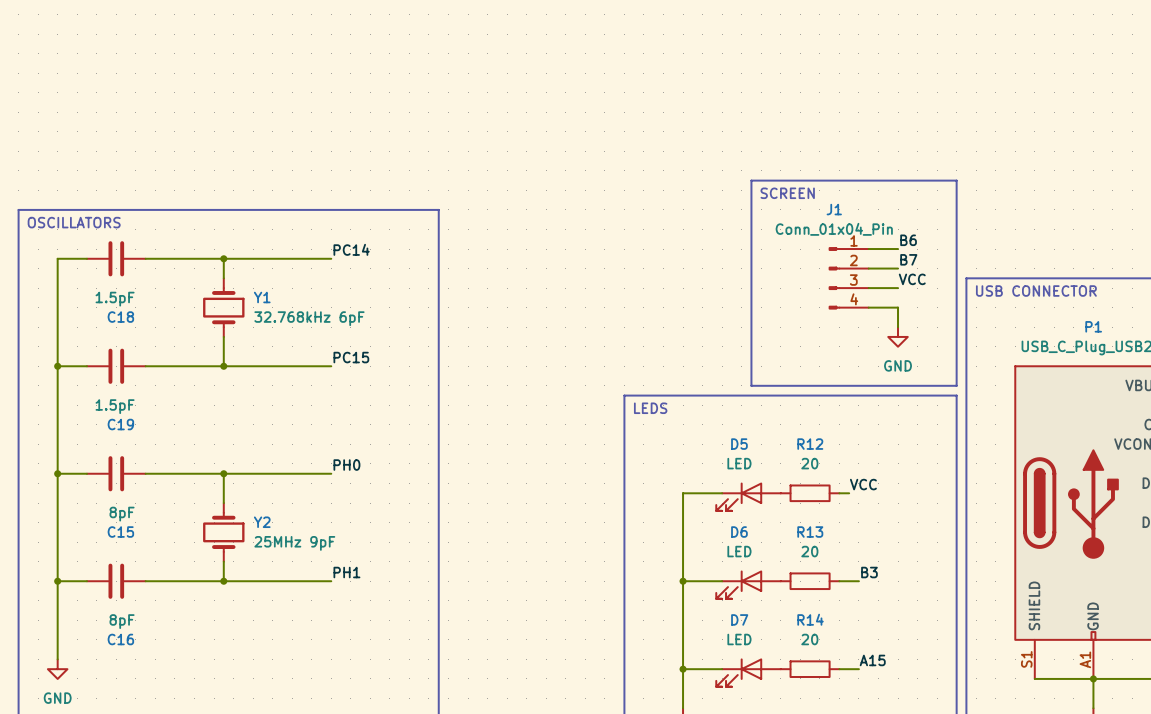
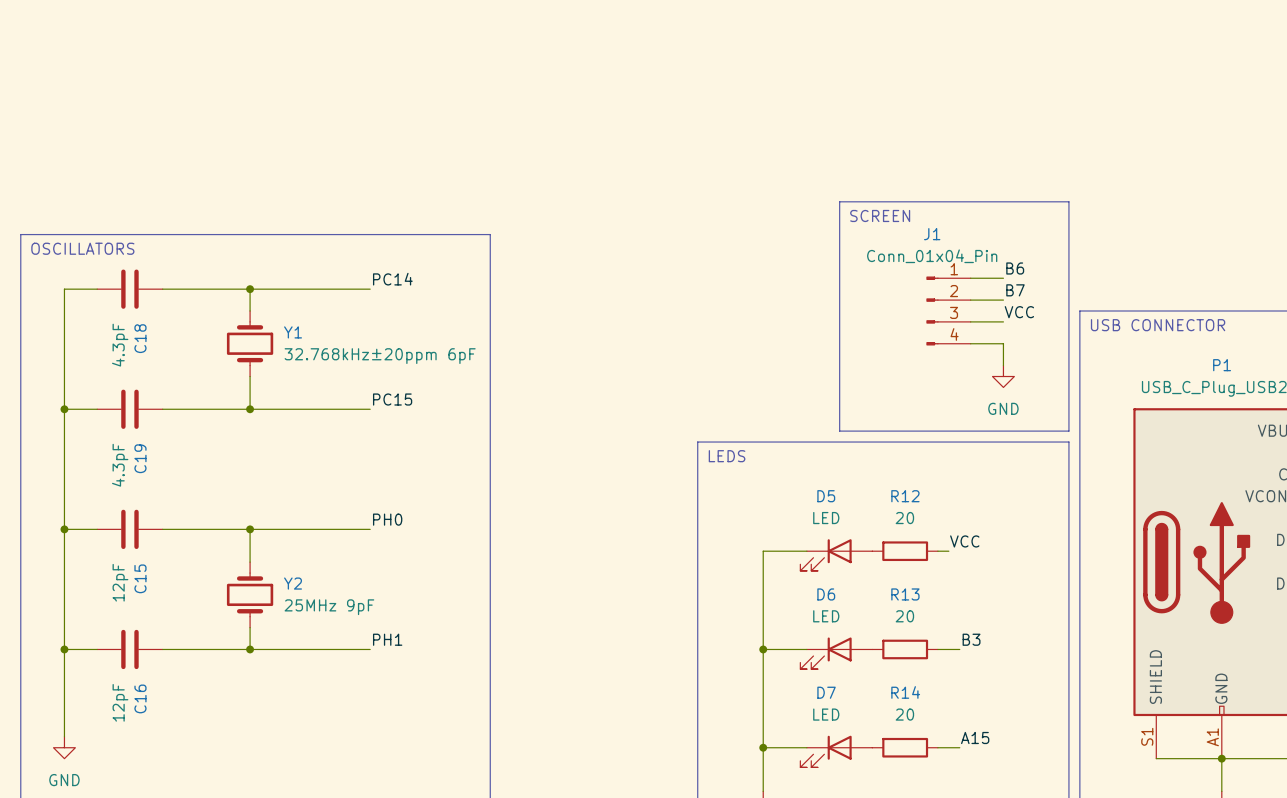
C18 value: 1.5pF (115, 299) -> 4.3pF (120, 345)
C18 name rotation: 0° (120, 317) -> 90° counterclockwise (140, 338)
Y1 value: 32.768kHz 6pF (309, 318) -> 32.768kHz±20ppm 6pF (380, 356)
C19 value: 1.5pF (115, 406) -> 4.3pF (120, 465)
C19 name rotation: 0° (120, 424) -> 90° counterclockwise (140, 458)
C15 value: 8pF (122, 514) -> 12pF (120, 582)
C15 name rotation: 0° (120, 532) -> 90° counterclockwise (140, 578)
C16 value: 8pF (122, 621) -> 12pF (120, 702)
C16 name rotation: 0° (120, 639) -> 90° counterclockwise (140, 698)

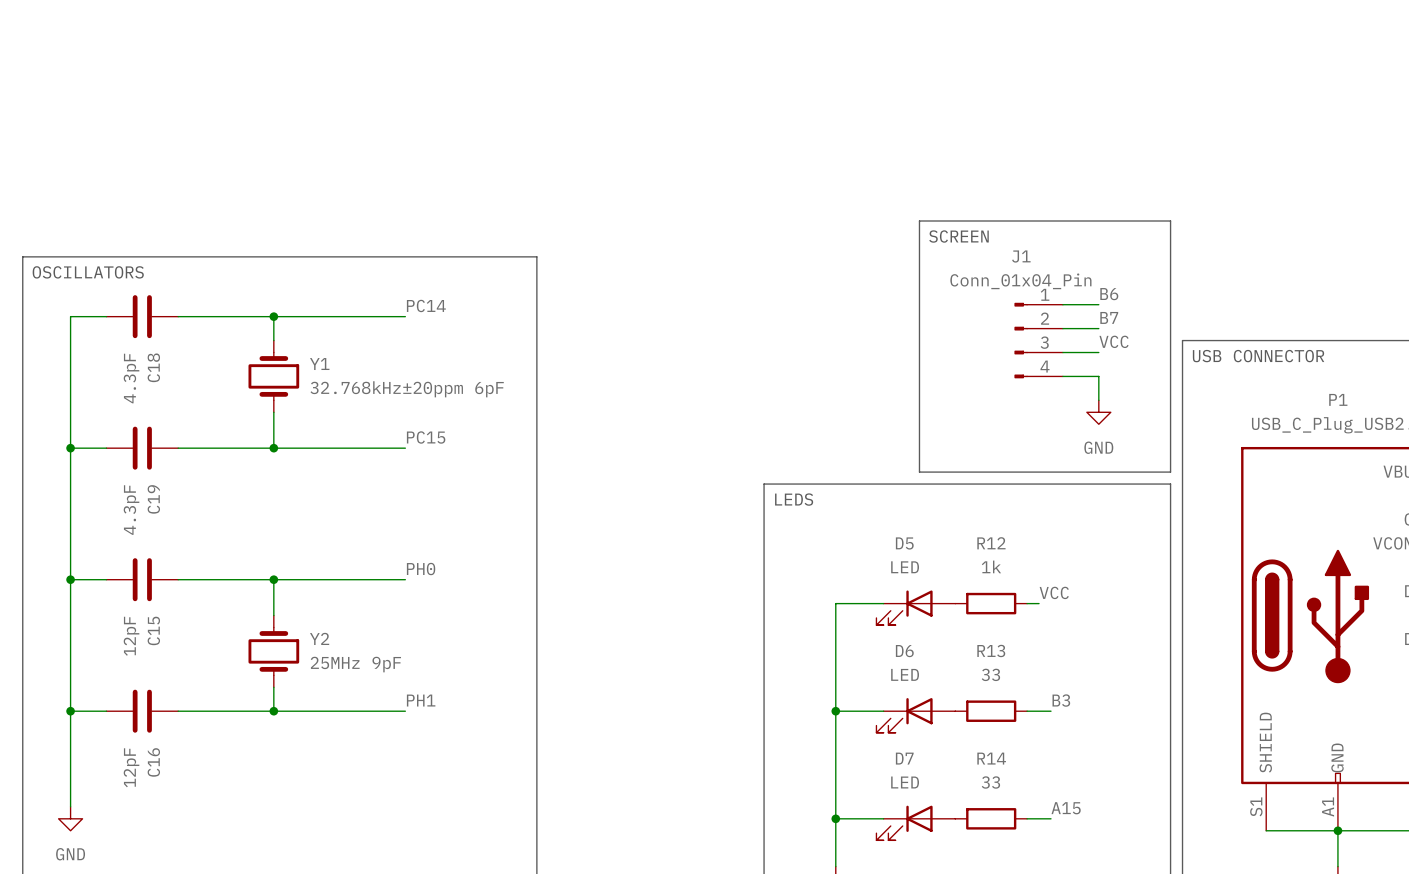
R12 value: 20 (904, 518) -> 1k (991, 566)
R13 value: 20 (904, 616) -> 33 (990, 674)
R14 value: 20 (904, 714) -> 33 (990, 782)

